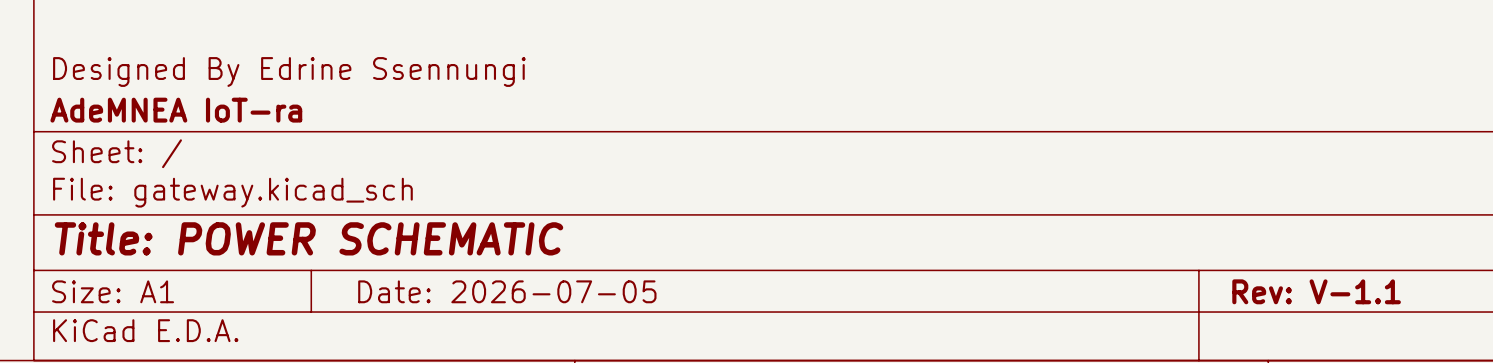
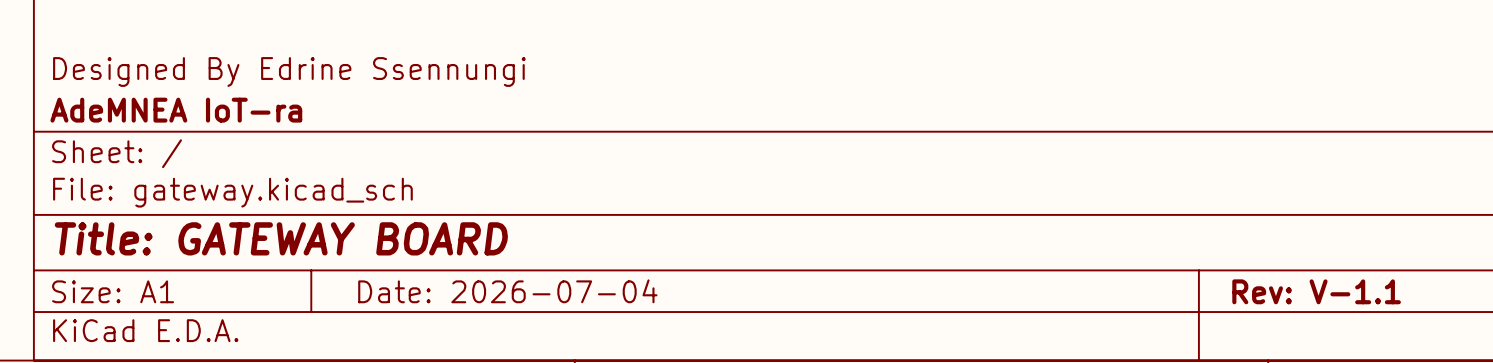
title block: Title: POWER SCHEMATIC (308, 238) -> Title: GATEWAY BOARD (281, 238)
title block: Date: 2026-07-05 (507, 291) -> Date: 2026-07-04 (507, 291)

